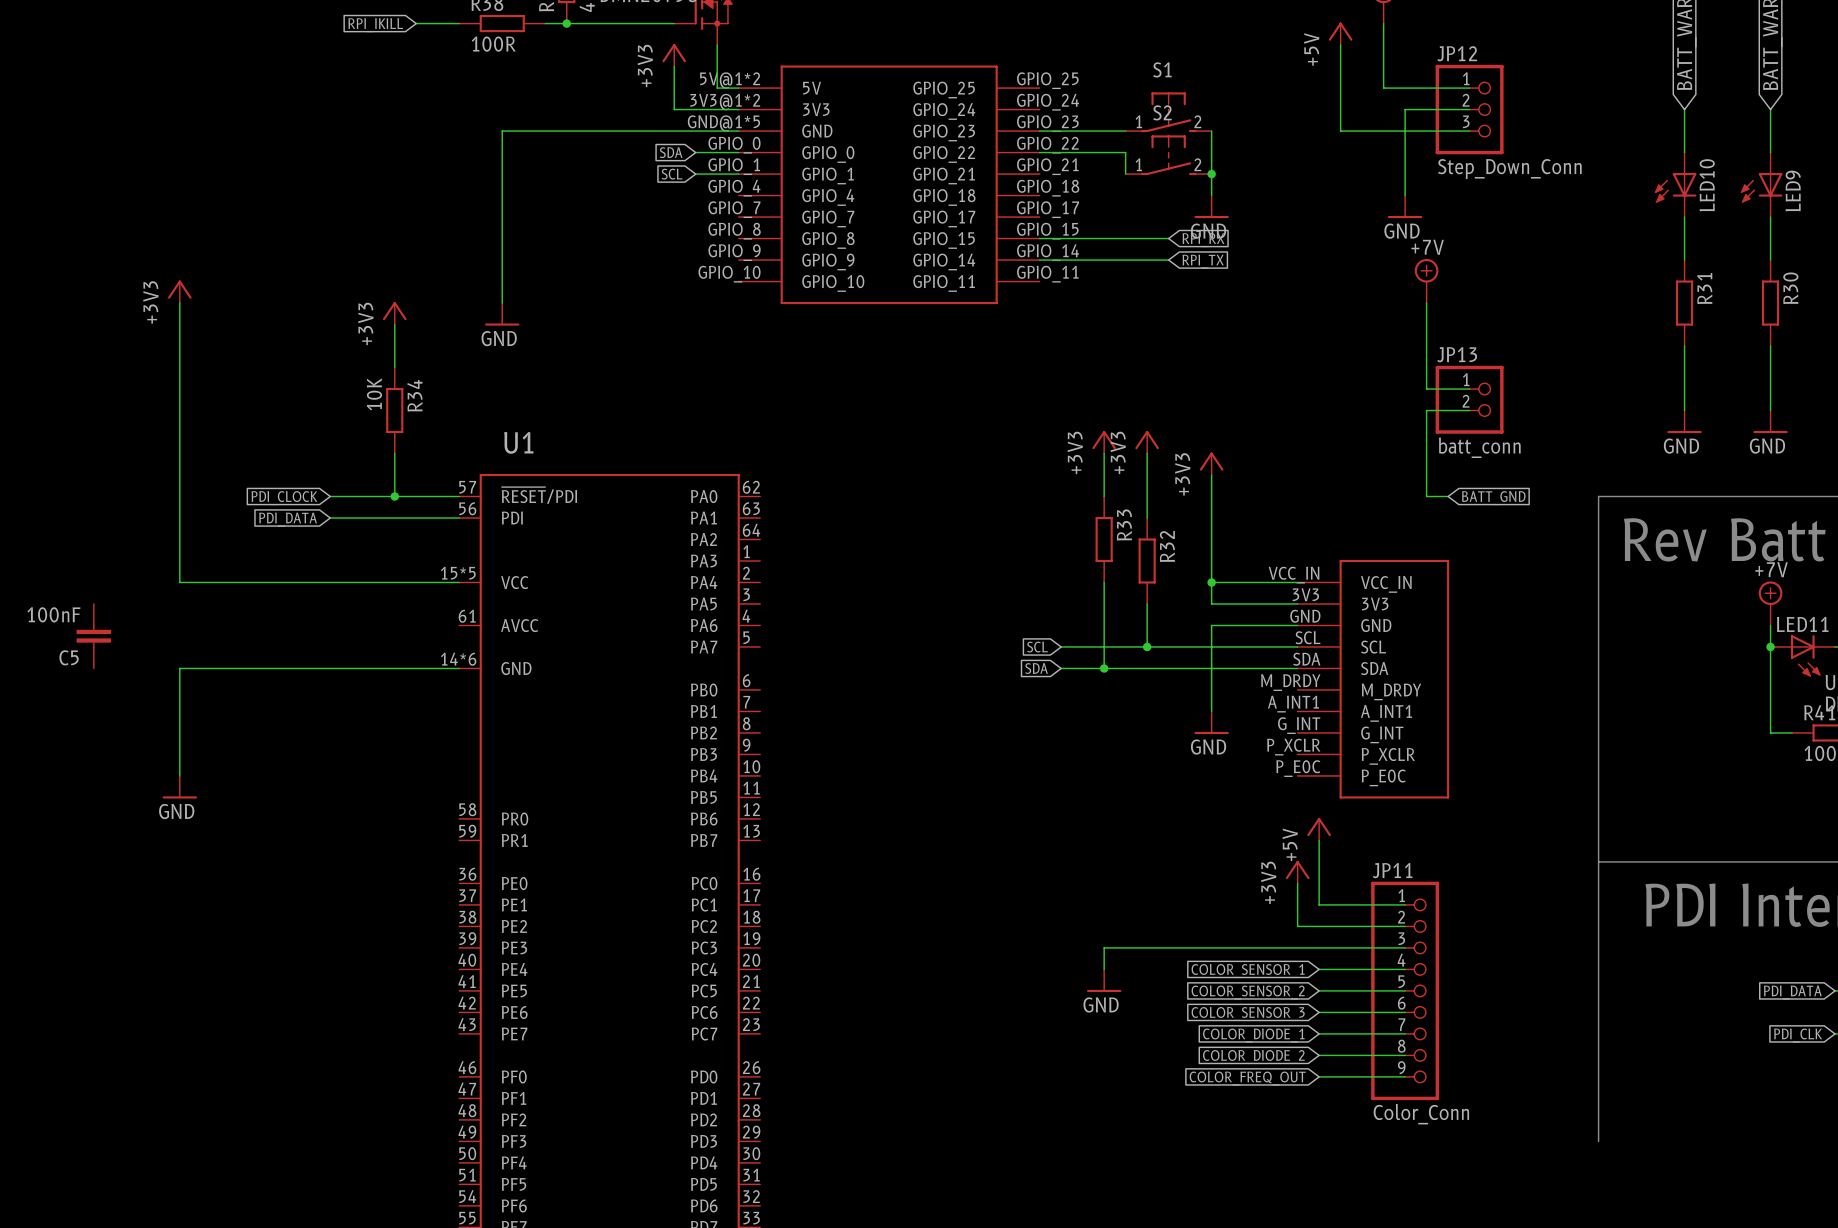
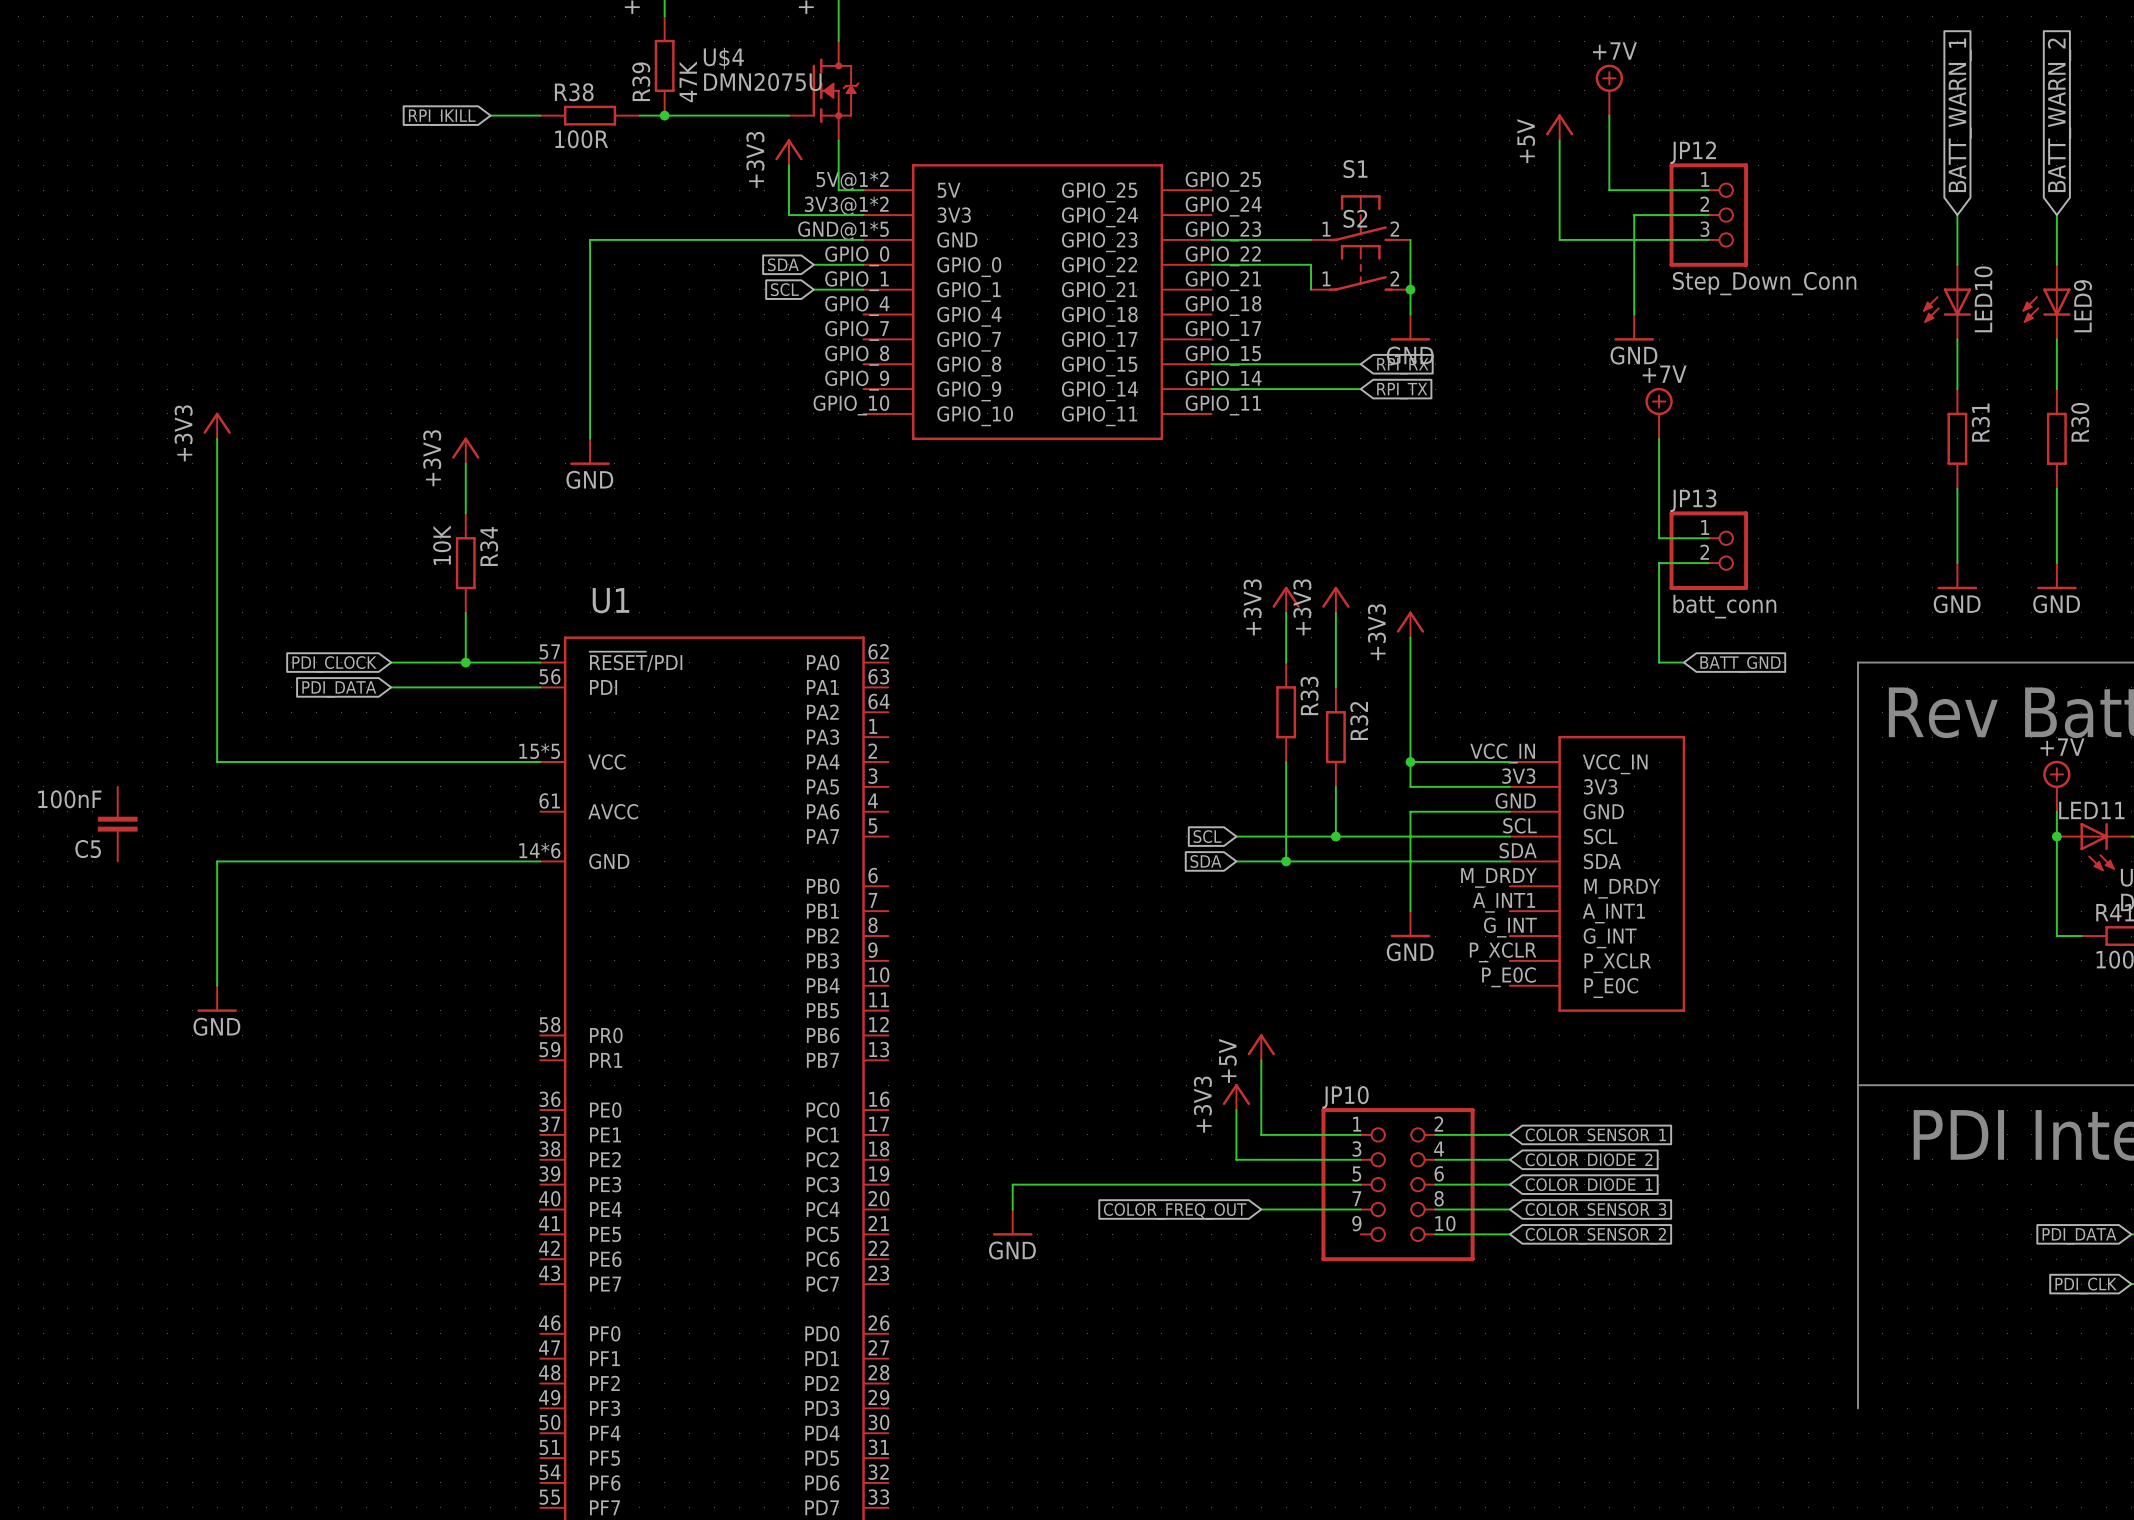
power symbol: none -> +5V (1261, 1047)
power symbol: +5V (1319, 829) -> none
wire: none -> (1261, 1060) (1261, 1134) (1360, 1134)
wire: (1319, 840) (1319, 904) (1405, 904) -> none
power symbol: none -> +3V3 (1236, 1097)
power symbol: +3V3 (1297, 872) -> none
wire: none -> (1236, 1110) (1236, 1159) (1360, 1159)
wire: (1297, 883) (1297, 926) (1405, 926) -> none
wire: none -> (1435, 1134) (1509, 1134)
wire: none -> (1435, 1159) (1509, 1159)
wire: (1104, 947) (1104, 969) -> (1286, 1184) (1012, 1184) (1012, 1209)
wire: (1168, 947) (1233, 947) -> (1435, 1209) (1509, 1209)
JP10: none -> (1398, 1184)
wire: (1297, 947) (1405, 947) -> none
wire: none -> (1261, 1209) (1360, 1209)
wire: (1319, 969) (1405, 969) -> none
global label: none -> COLOR_FREQ_OUT (1175, 1211)
global label rotation: 0° (1248, 971) -> 180° (1595, 1136)
power symbol: none -> GND (1012, 1222)
power symbol: GND (1104, 980) -> none
wire: none -> (1435, 1234) (1509, 1234)
wire: (1319, 990) (1405, 990) -> none
JP11: Color_Conn (1405, 990) -> none
global label rotation: 0° (1248, 992) -> 180° (1595, 1236)
wire: (1319, 1012) (1405, 1012) -> none
global label rotation: 0° (1248, 1014) -> 180° (1595, 1211)
wire: (1319, 1033) (1405, 1033) -> none
global label rotation: 0° (1253, 1035) -> 180° (1589, 1186)
global label position: COLOR_DIODE_1 (1253, 1035) -> COLOR_DIODE_1 (1589, 1186)
wire: (1319, 1055) (1405, 1055) -> none
global label rotation: 0° (1253, 1057) -> 180° (1589, 1161)
global label position: COLOR_DIODE_2 (1253, 1057) -> COLOR_DIODE_2 (1589, 1161)
wire: (1319, 1076) (1405, 1076) -> none
global label: COLOR_FREQ_OUT (1247, 1078) -> none

